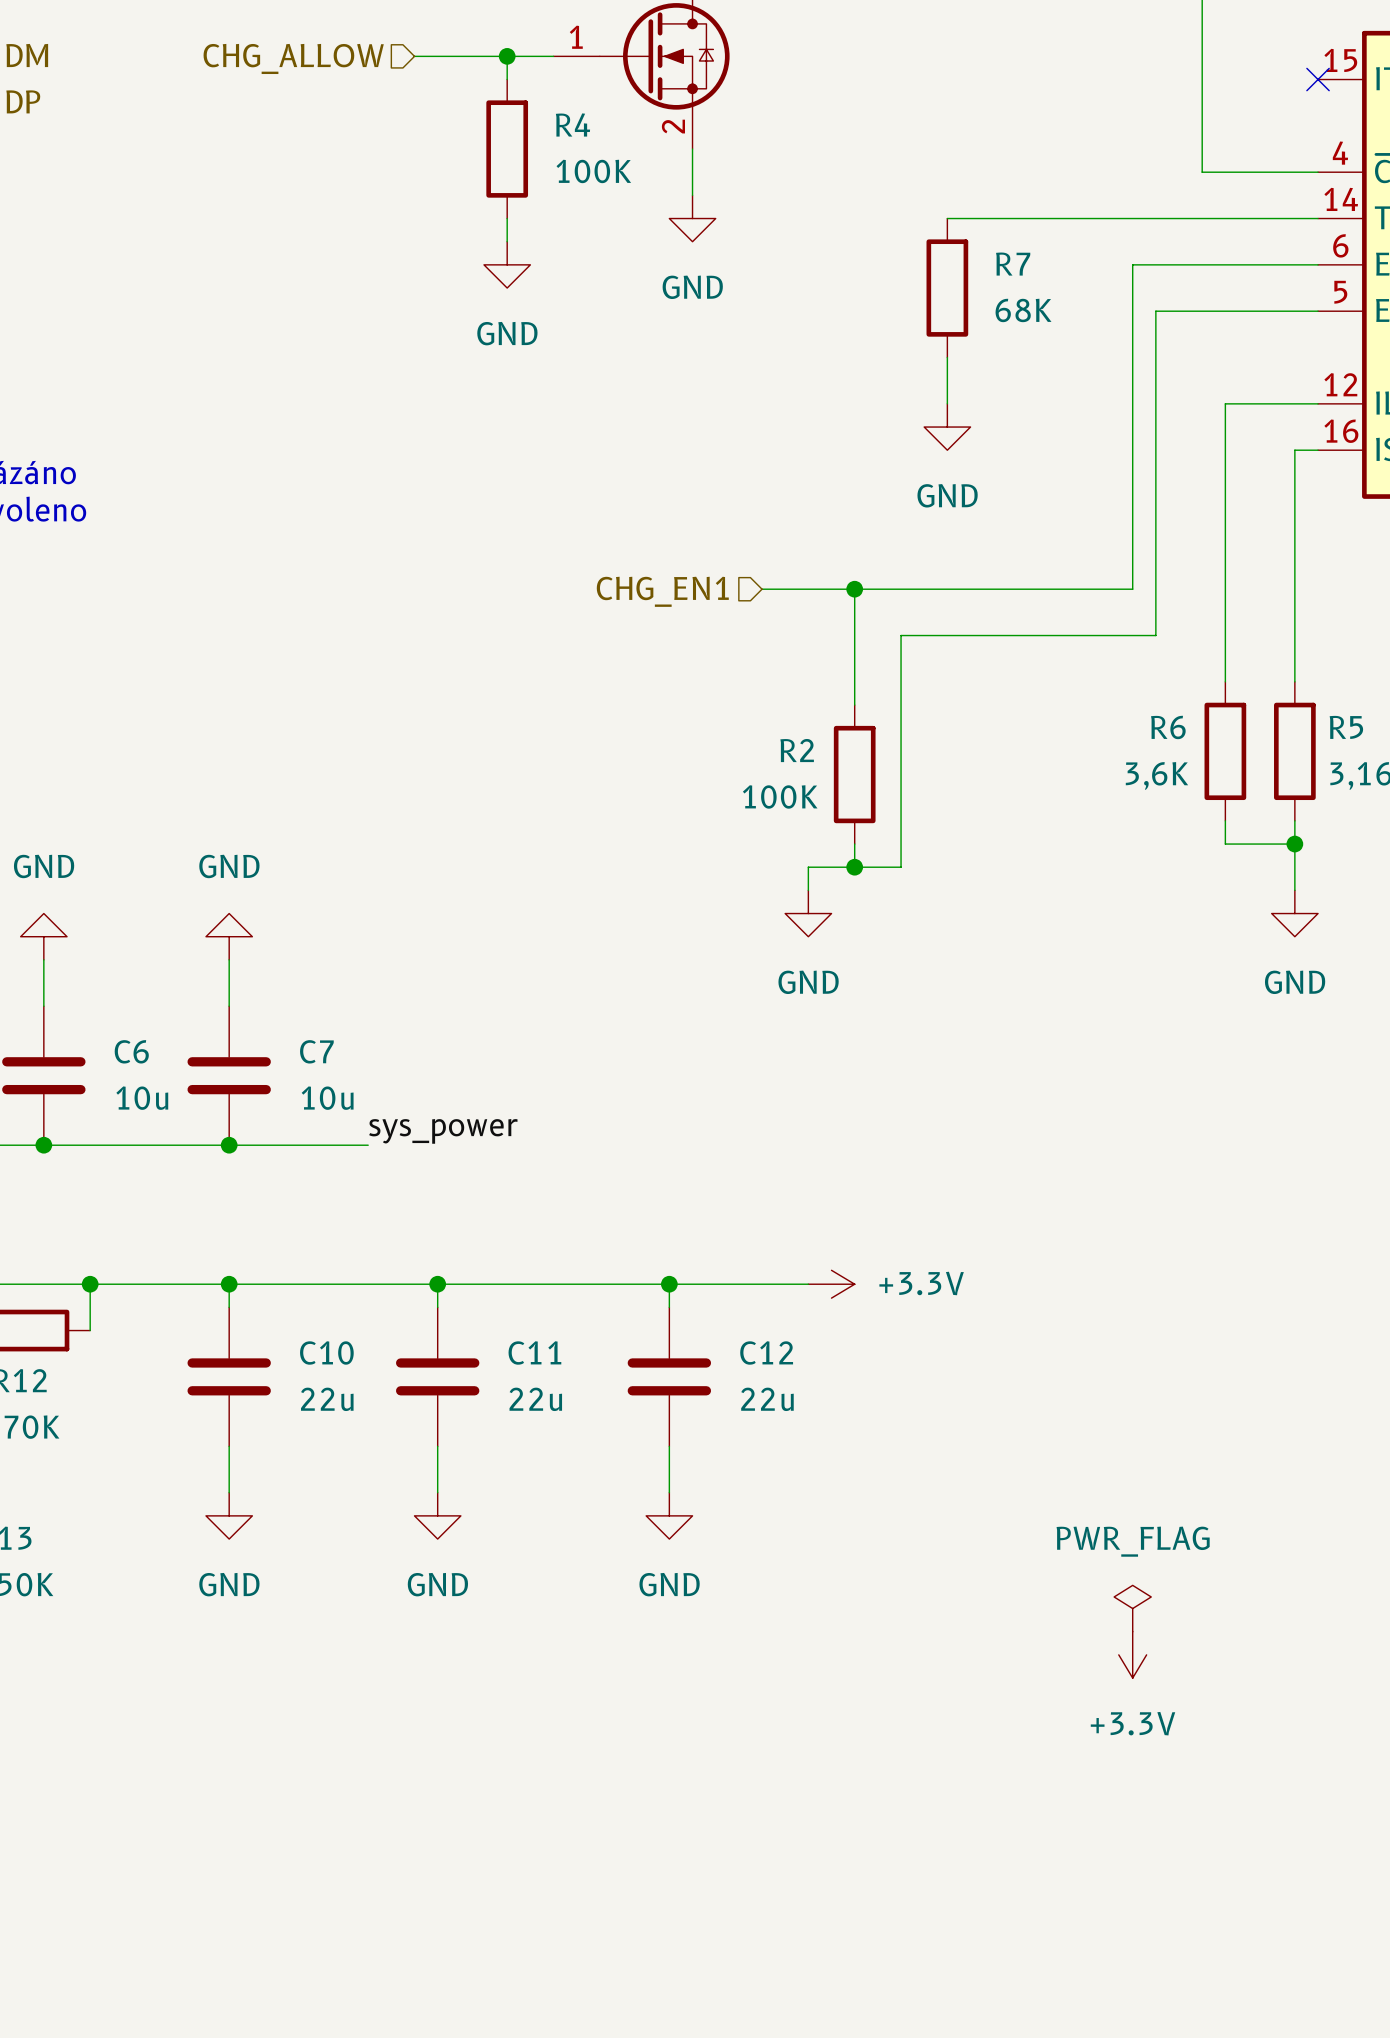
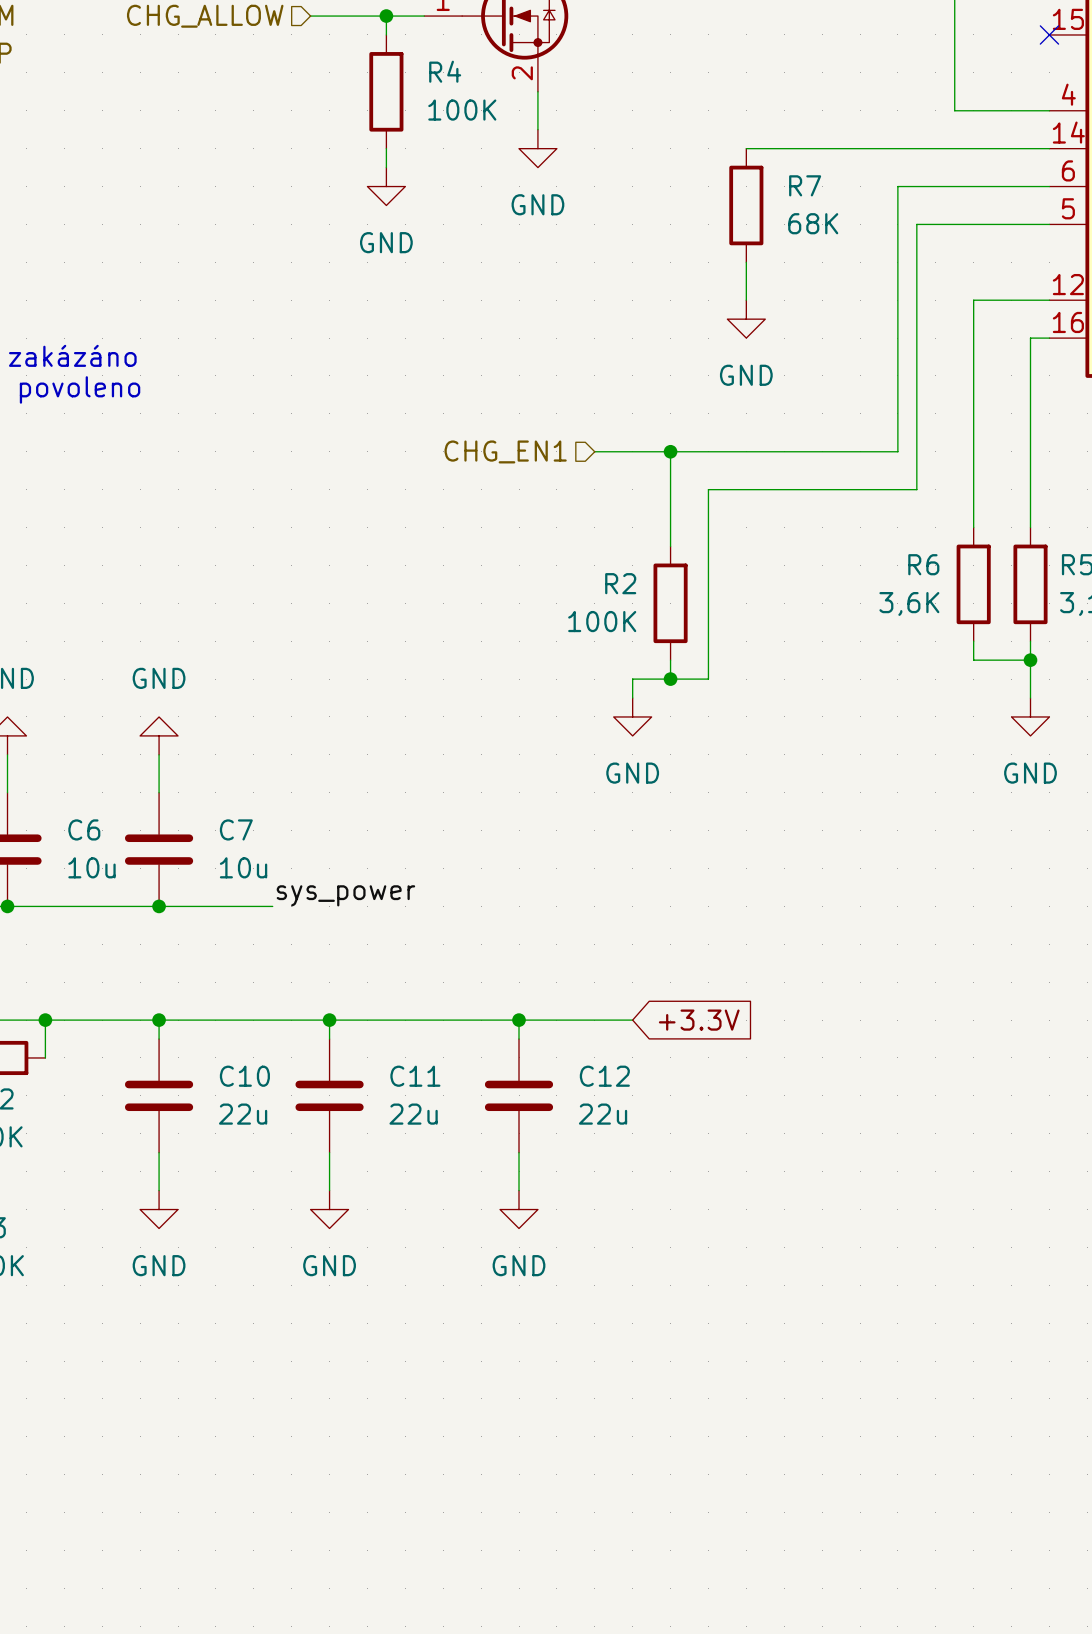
power symbol: +3.3V (831, 1284) -> none
global label: none -> +3.3V (699, 1020)
power symbol: PWR_FLAG (1132, 1608) -> none
power symbol: +3.3V (1132, 1654) -> none

